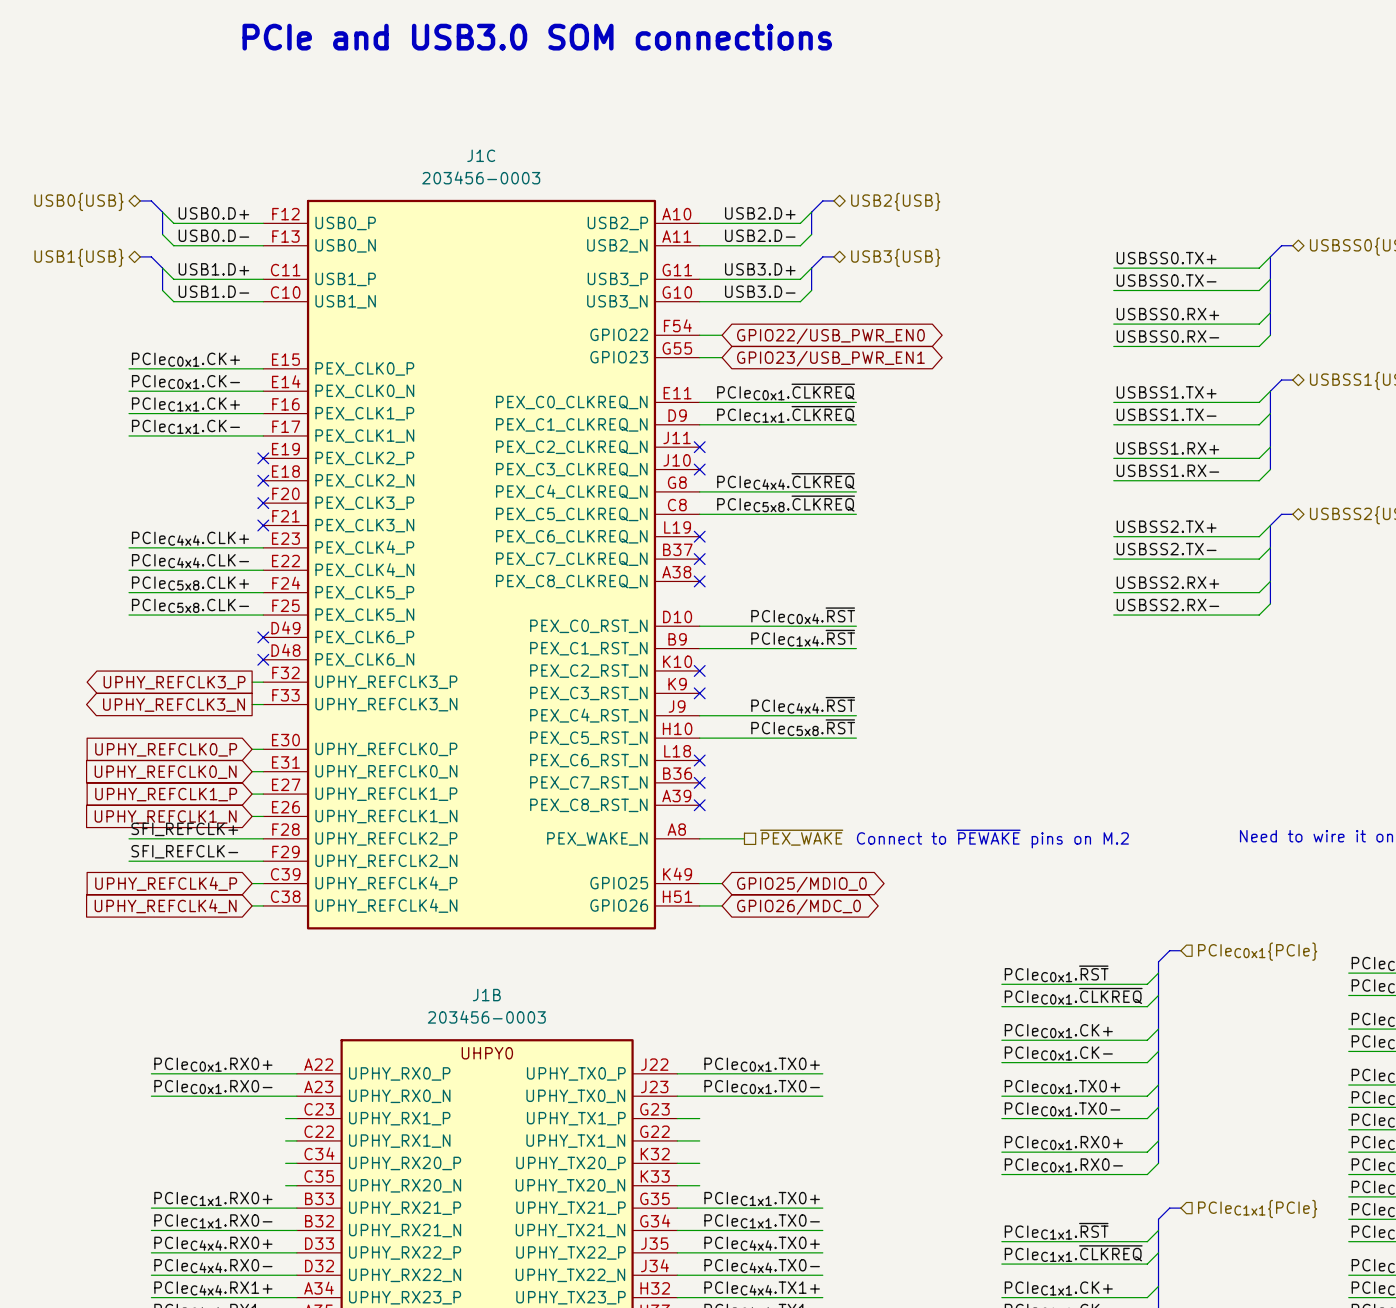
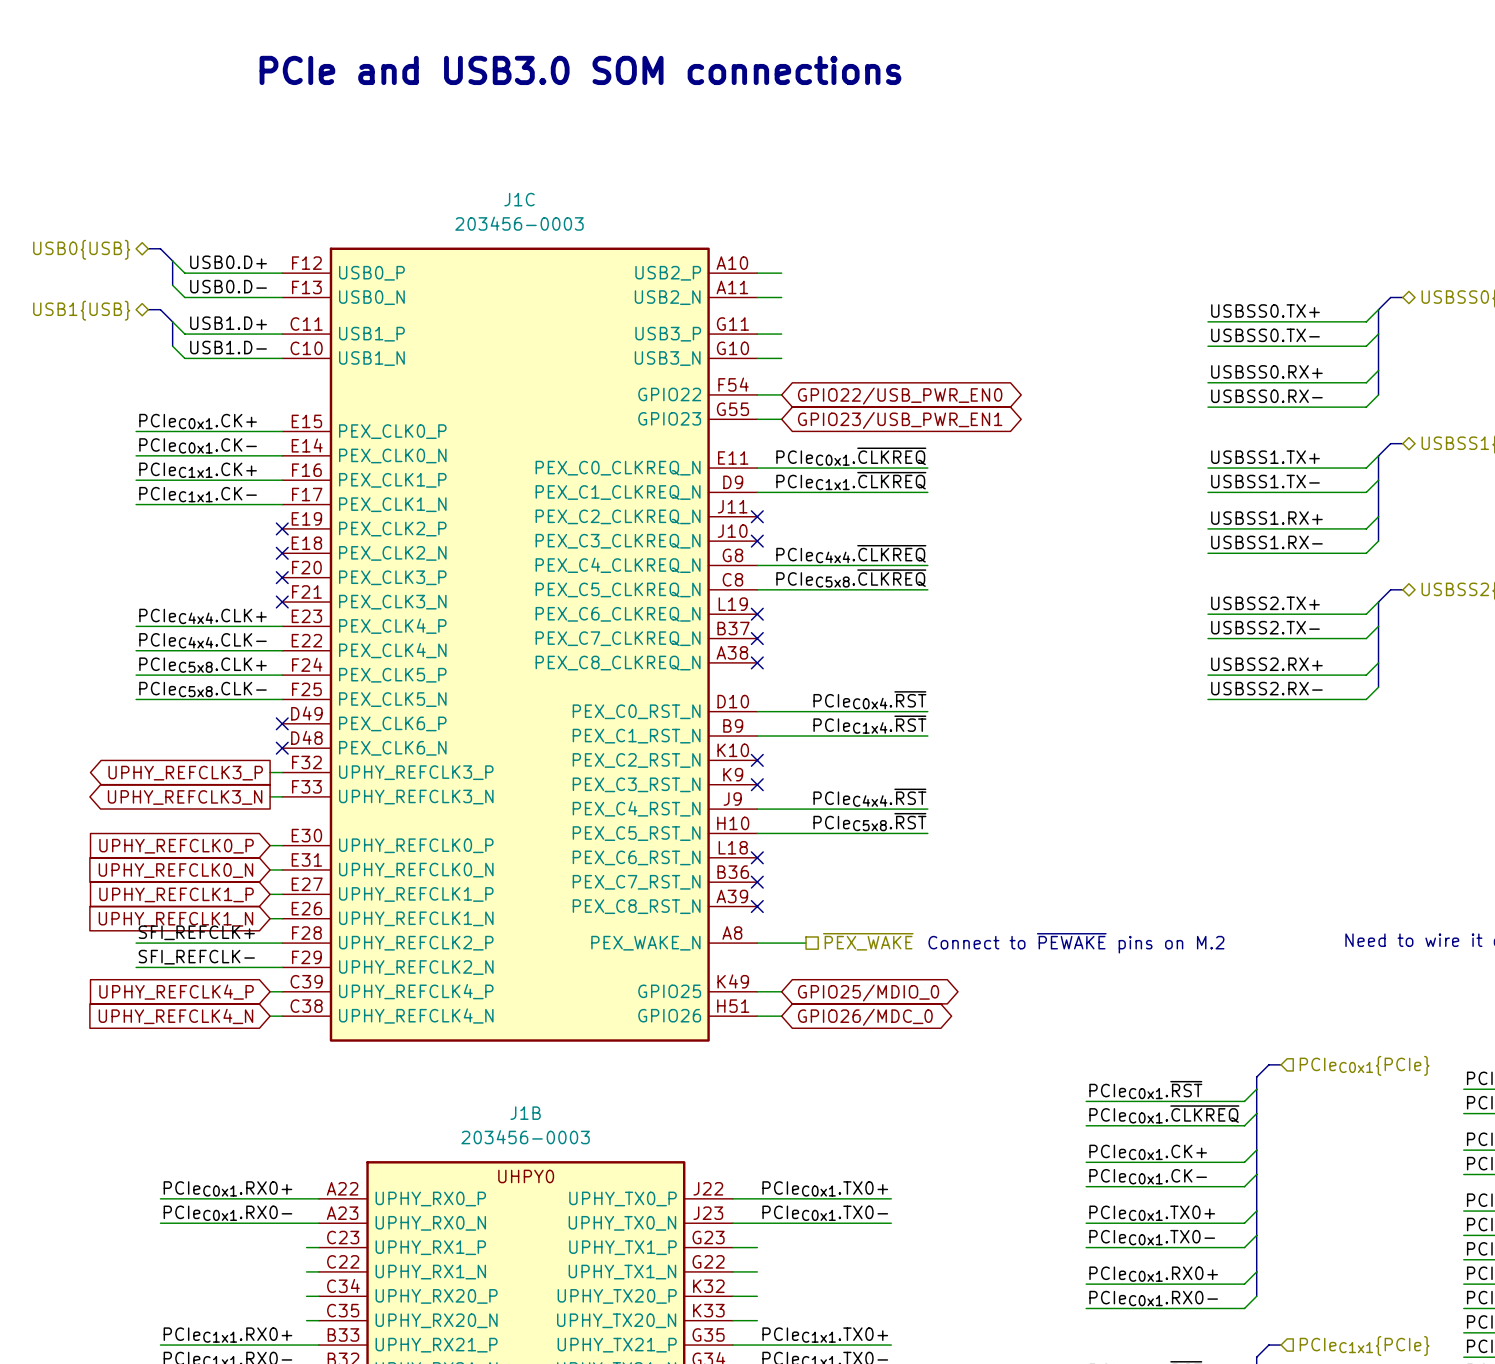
bus: (833, 200) (822, 200) (811, 212) (811, 234) -> none
hierarchical label: USB2{USB} (895, 201) -> none
wire: (811, 212) (800, 223) (722, 223) -> none
label: USB2.D+ (760, 213) -> none
wire: (811, 234) (800, 245) (722, 245) -> none
label: USB2.D- (760, 235) -> none
bus: (833, 256) (822, 256) (811, 268) (811, 290) -> none
hierarchical label: USB3{USB} (895, 257) -> none
wire: (811, 268) (800, 279) (722, 279) -> none
label: USB3.D+ (760, 269) -> none
wire: (811, 290) (800, 301) (722, 301) -> none
label: USB3.D- (760, 291) -> none

